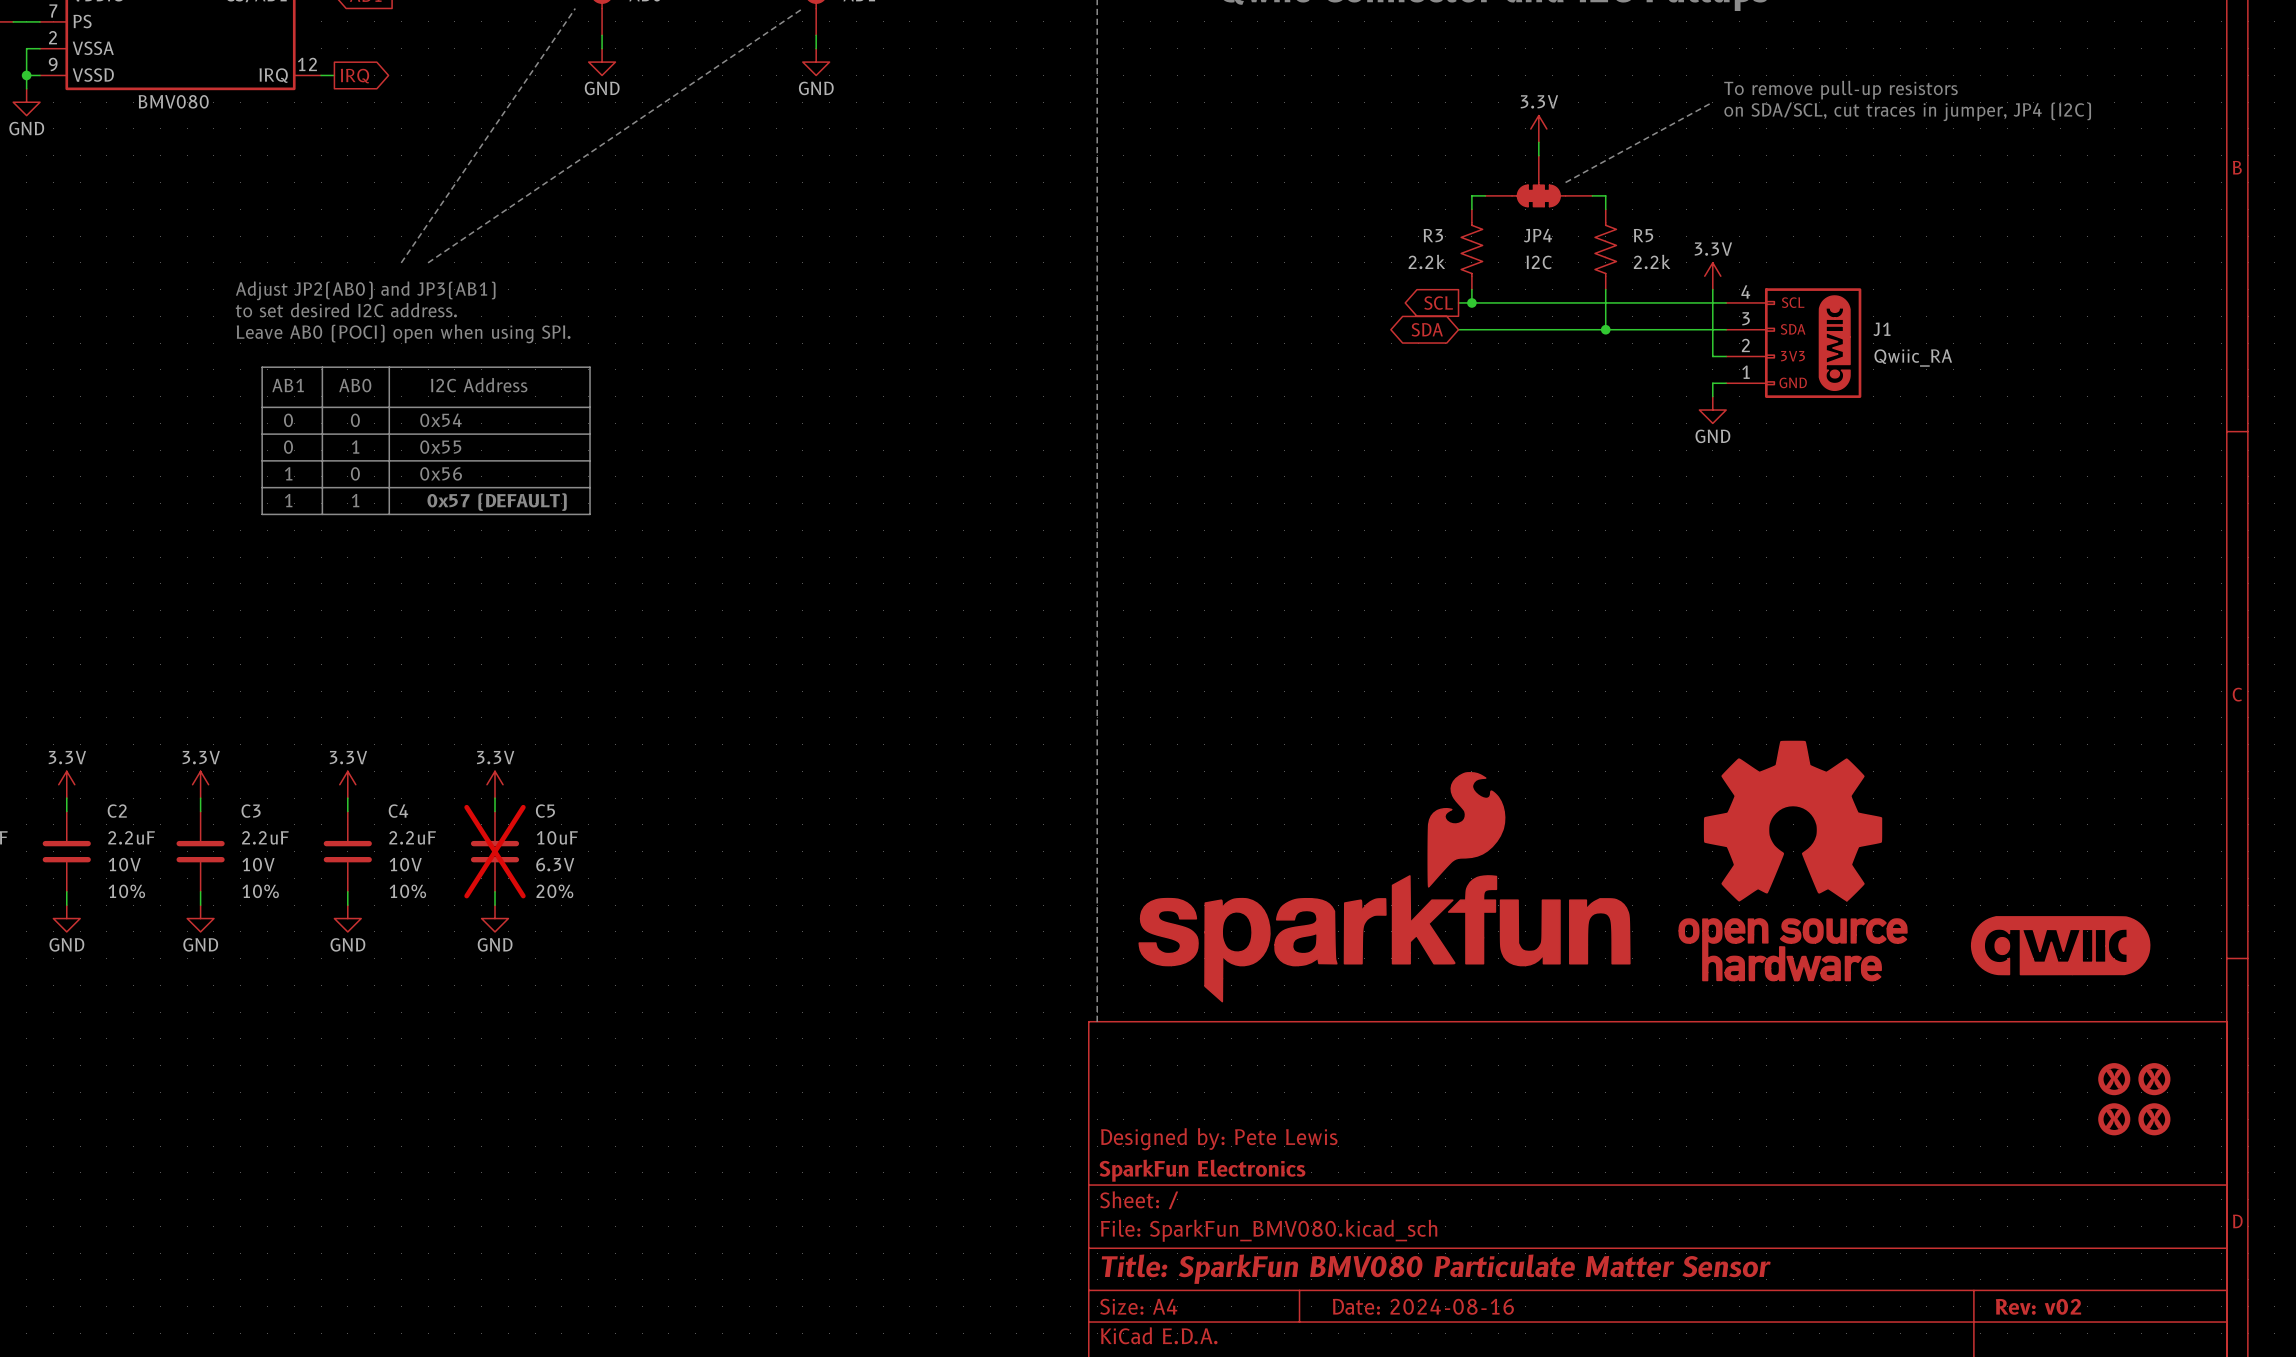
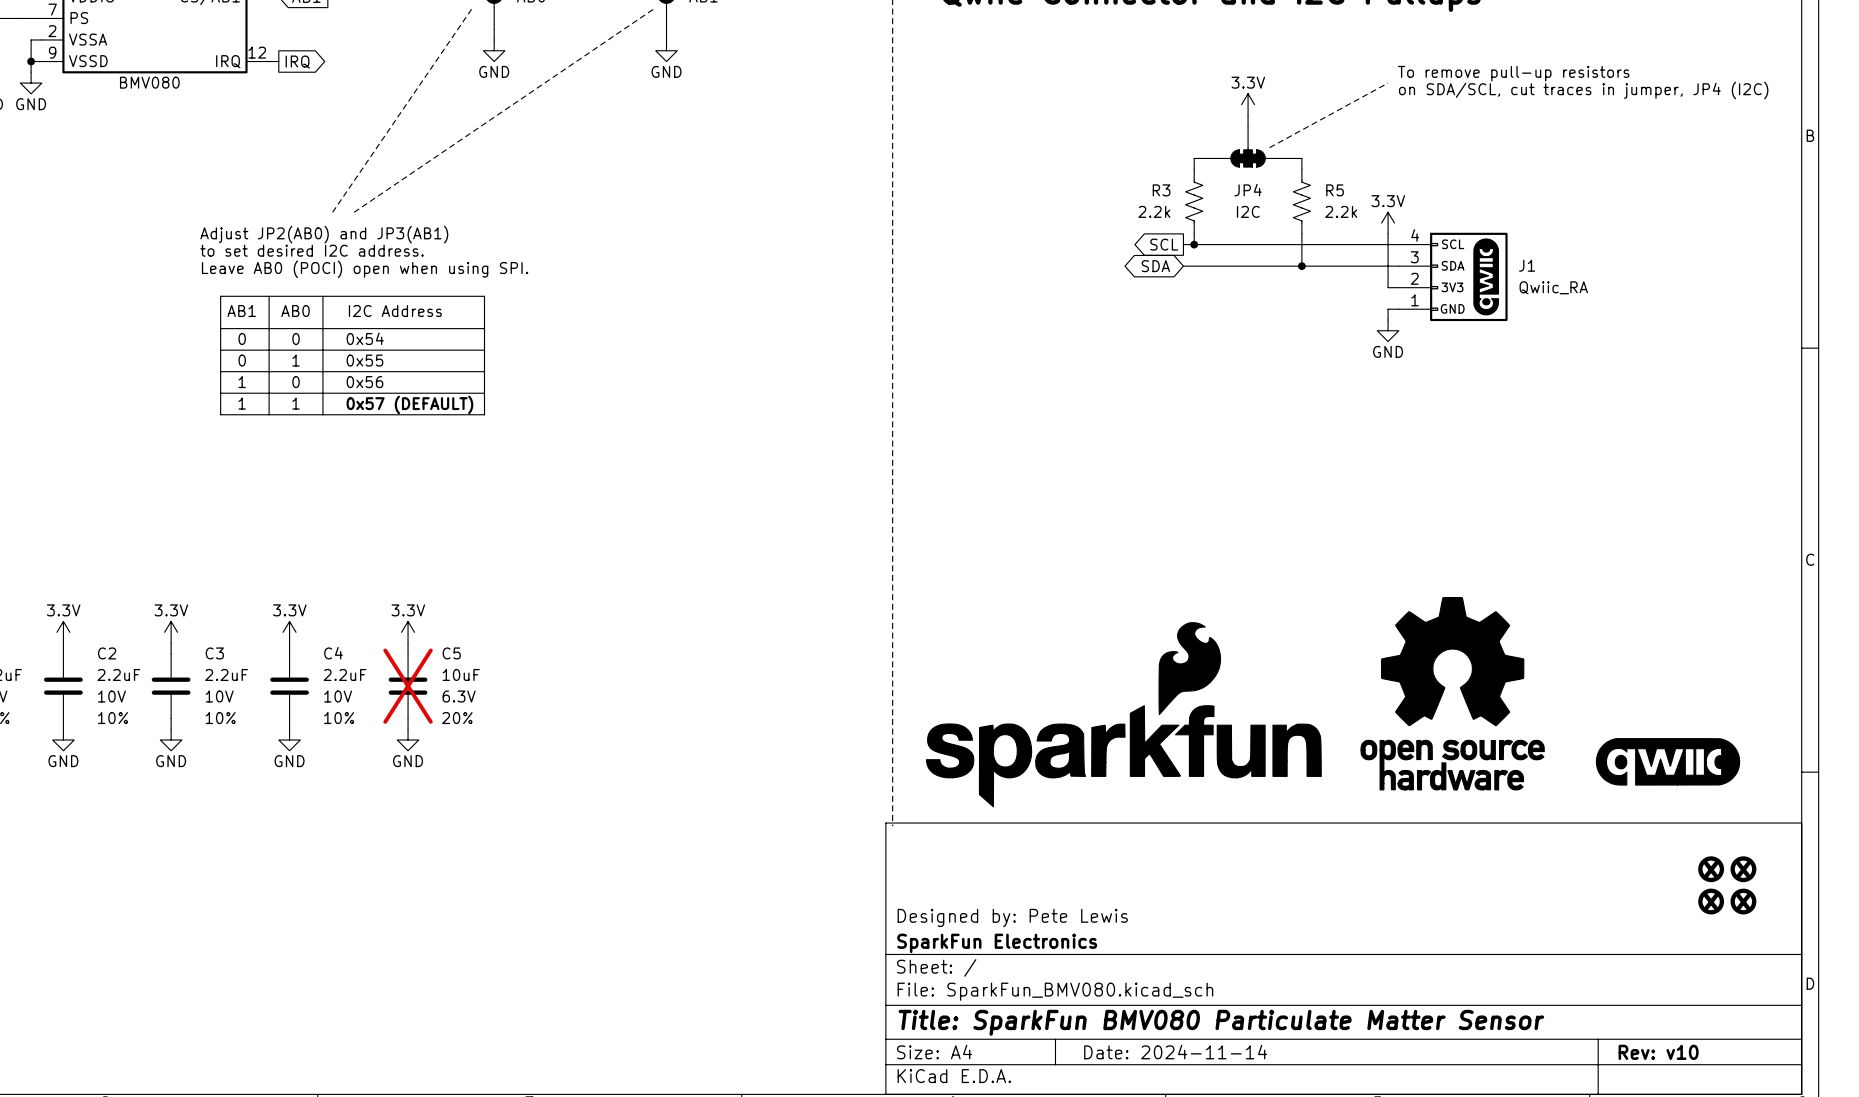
title block: Date: 2024-08-16 (1423, 1306) -> Date: 2024-11-14 (1175, 1052)
title block: Rev: v02 (2038, 1306) -> Rev: v10 (1658, 1052)

